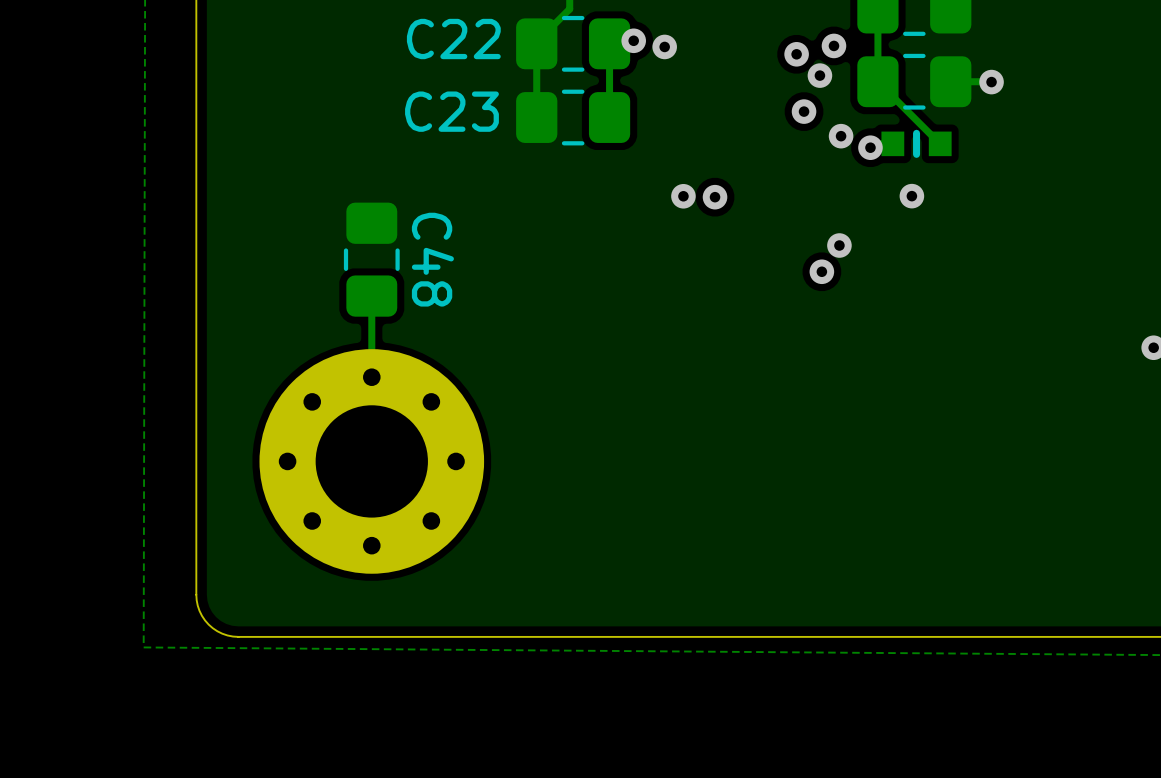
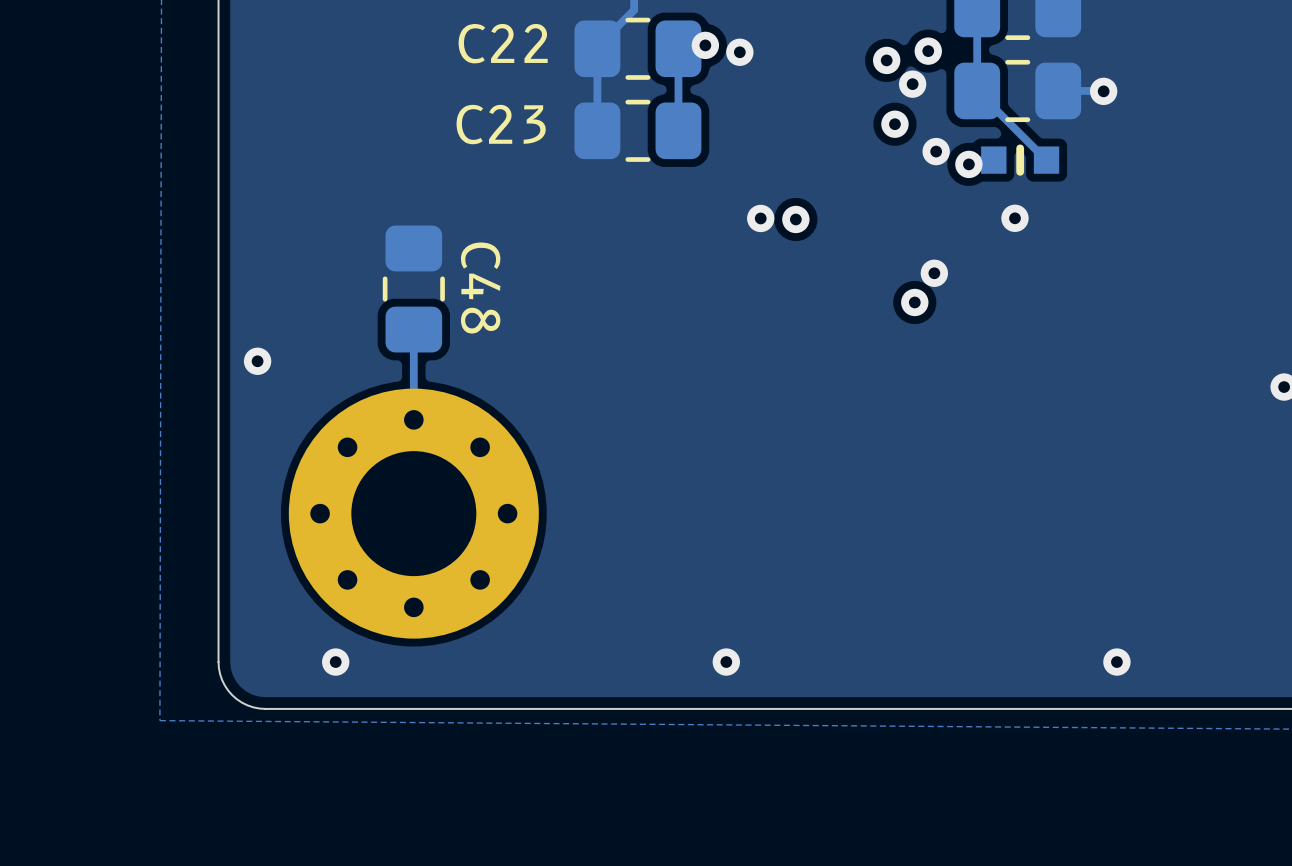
via: none -> (257, 361)
via: none -> (335, 662)
via: none -> (726, 662)
via: none -> (1116, 662)

